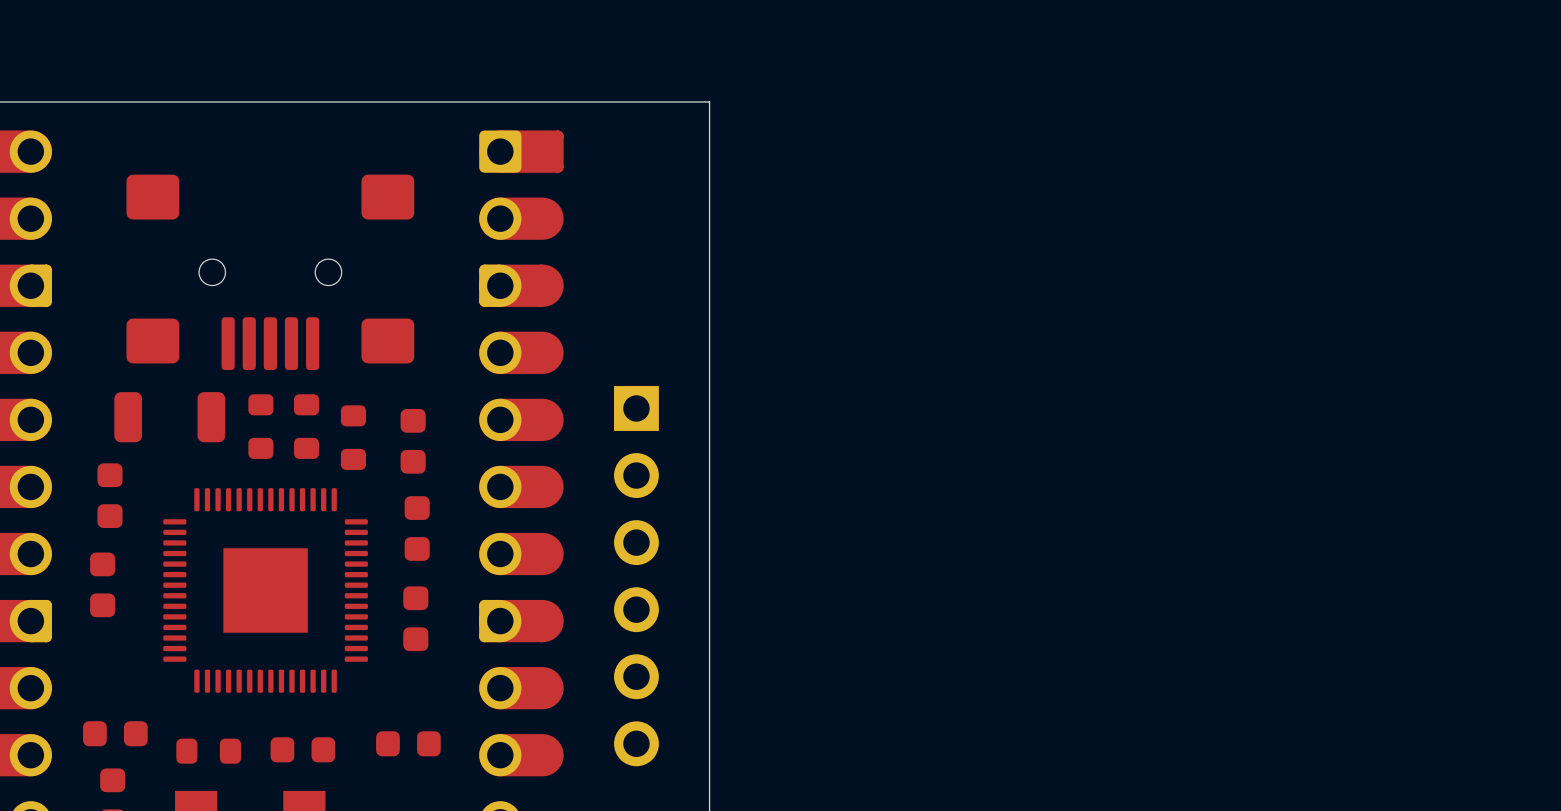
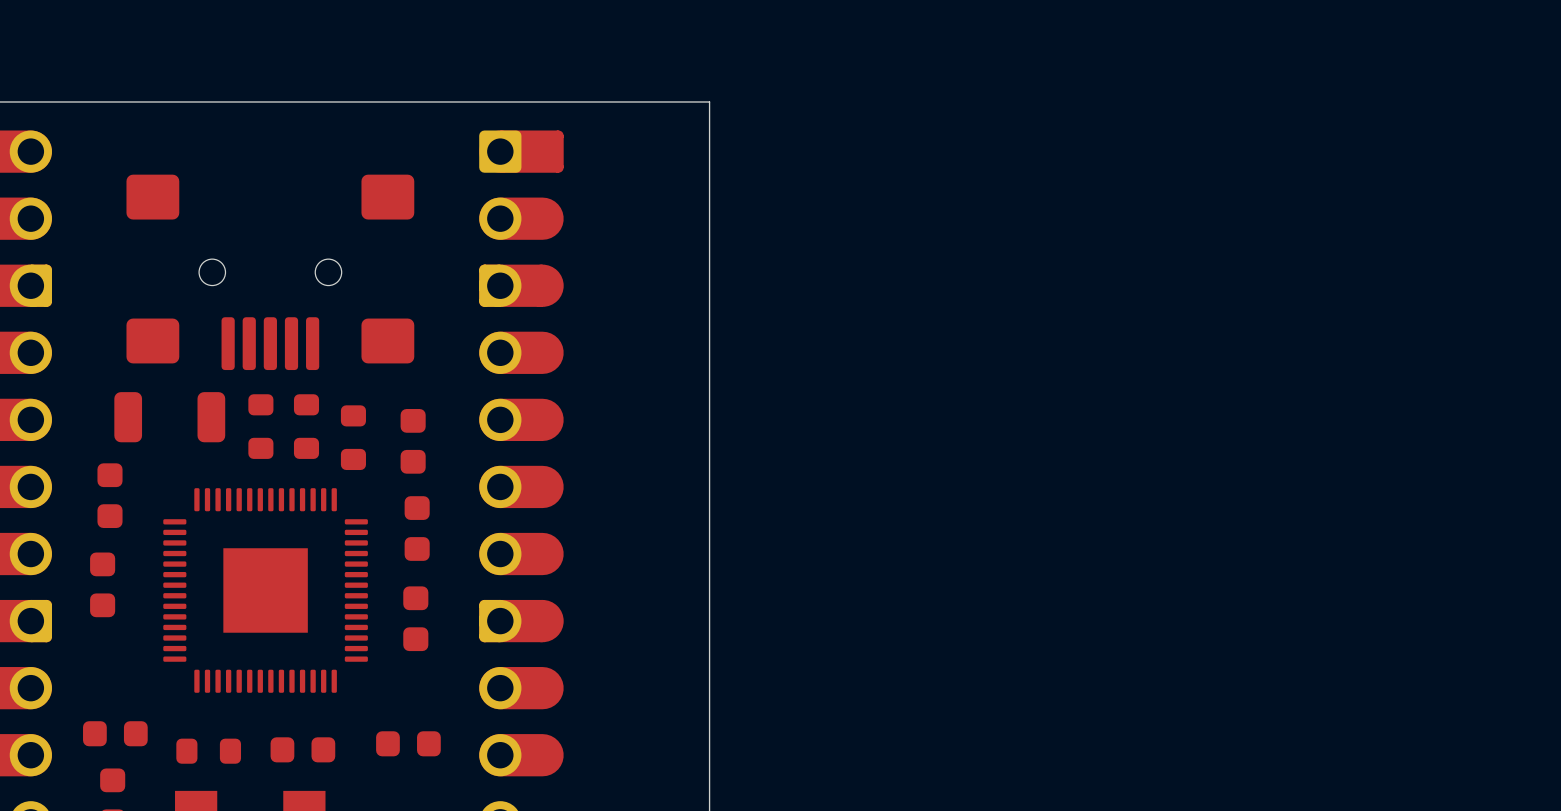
part: (636, 576) -> none

